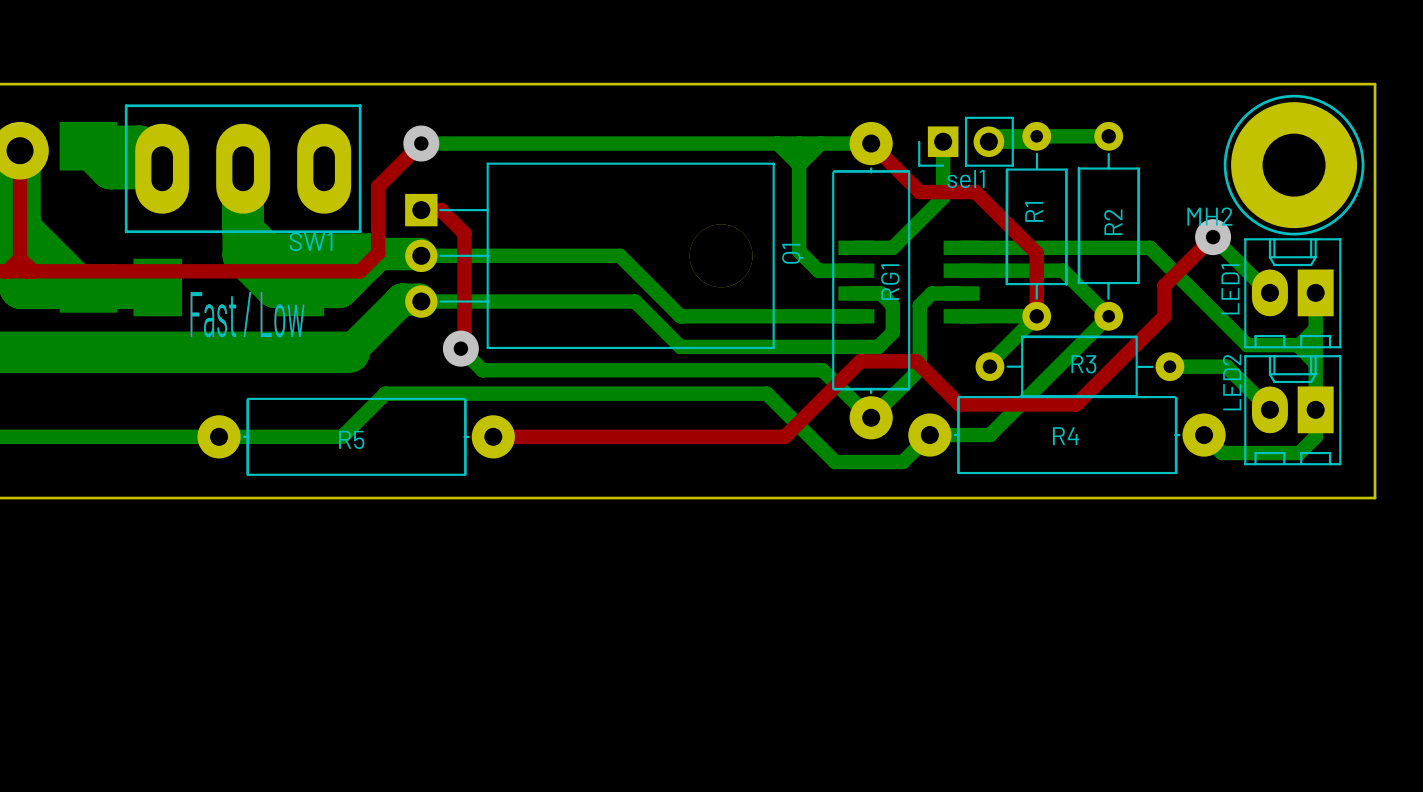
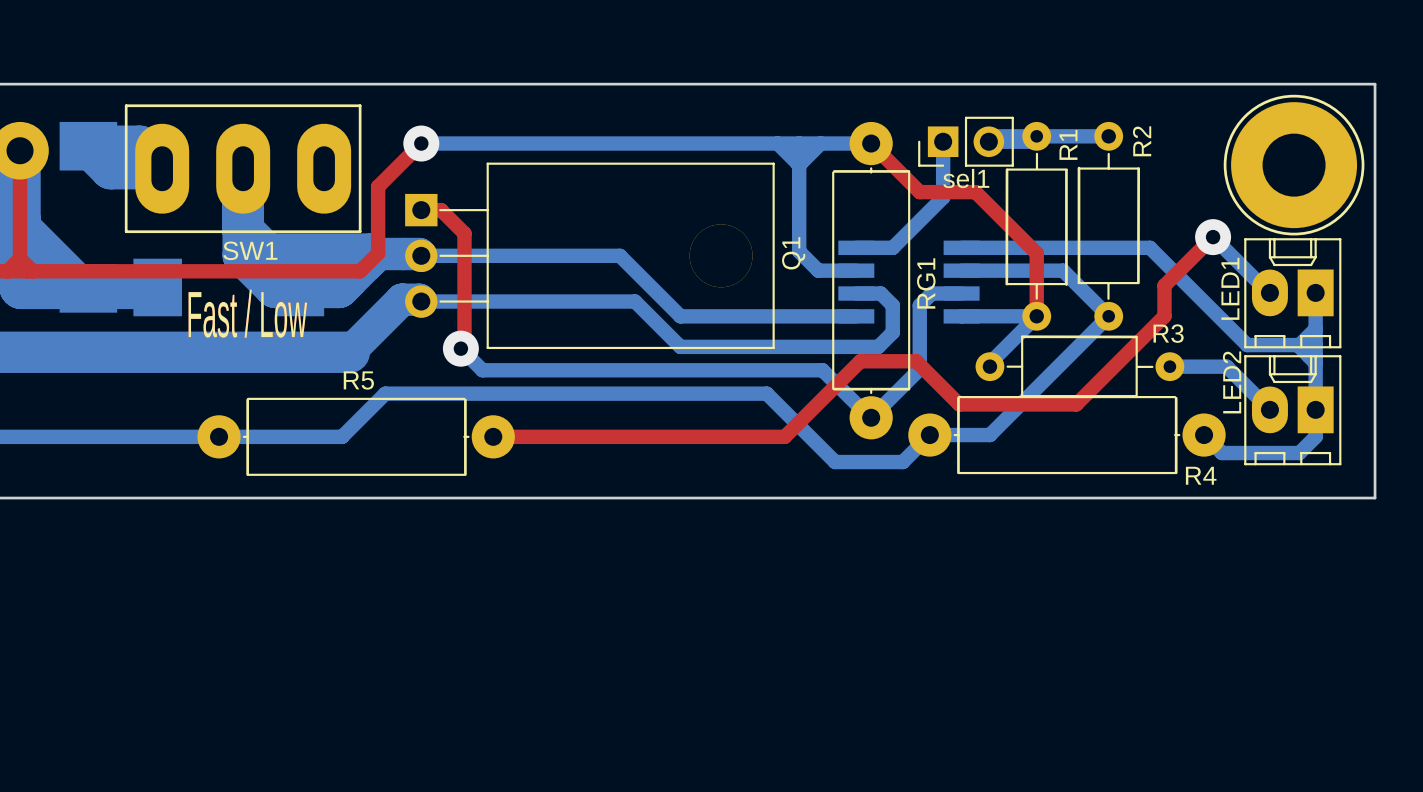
R1 name position: R1 (1034, 211) -> R1 (1068, 144)
MH2 name: MH2 (1209, 216) -> none
R2 name position: R2 (1113, 222) -> R2 (1142, 141)
SW1 name position: SW1 (311, 241) -> SW1 (250, 250)
RG1 name position: RG1 (890, 282) -> RG1 (926, 283)
R3 name position: R3 (1083, 364) -> R3 (1168, 333)
R4 name position: R4 (1065, 436) -> R4 (1201, 475)
R5 name position: R5 (351, 439) -> R5 (358, 380)

